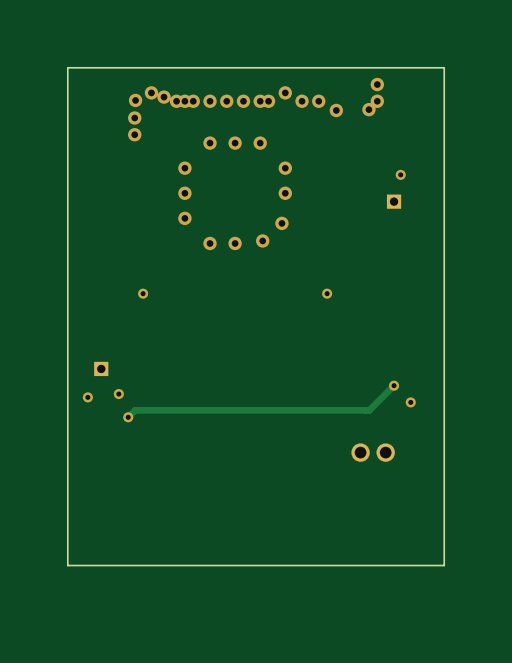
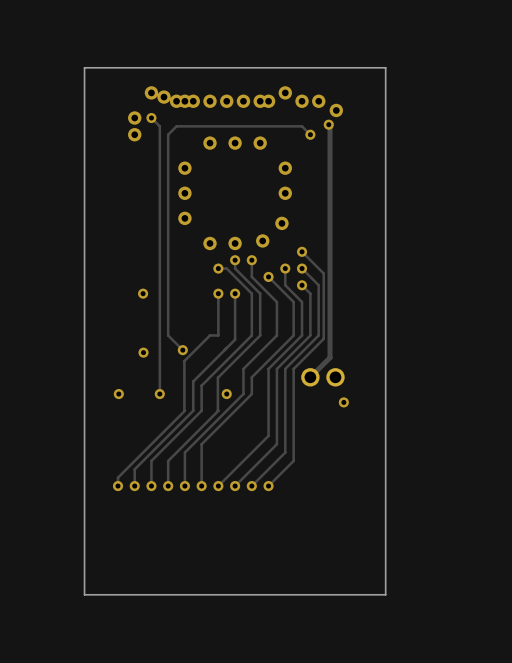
board edge: (385, 67) (444, 67) (444, 565) (67, 565) (67, 67) (84, 67) -> (385, 67) (385, 594) (84, 594) (84, 67)
via: (377, 84) -> none
via: (135, 100) -> none
via: (377, 101) -> none
via: (368, 109) -> none
track: none -> (151, 117) (159, 126) (159, 394)
via: none -> (151, 117)
track: none -> (328, 124) (330, 357) (310, 377)
via: none -> (328, 124)
track: none -> (310, 134) (302, 126) (176, 126) (168, 134) (168, 335) (182, 350)
via: none -> (310, 134)
via: (400, 174) -> none
part: (394, 201) -> none
track: none -> (302, 251) (323, 273) (323, 338) (293, 368) (293, 460) (268, 486)
via: none -> (302, 251)
track: none -> (235, 260) (235, 268) (260, 293) (260, 335) (217, 377) (218, 410) (168, 460) (168, 486)
via: none -> (235, 260)
track: none -> (251, 260) (251, 276) (276, 302) (276, 335) (243, 368) (243, 394) (184, 452) (184, 486)
via: none -> (251, 260)
track: none -> (218, 268) (226, 268) (251, 293) (251, 335) (201, 385) (201, 410) (151, 460) (151, 486)
via: none -> (218, 268)
track: none -> (285, 268) (285, 285) (302, 302) (302, 335) (268, 368) (268, 435) (218, 486)
via: none -> (285, 268)
track: none -> (302, 268) (318, 285) (318, 335) (285, 368) (285, 452) (251, 486)
via: none -> (302, 268)
track: none -> (268, 276) (293, 302) (293, 335) (251, 377) (251, 394) (201, 444) (201, 486)
via: none -> (268, 276)
track: none -> (302, 285) (310, 293) (310, 335) (276, 368) (276, 444) (235, 486)
via: none -> (302, 285)
track: none -> (218, 293) (218, 335) (210, 335) (184, 361) (184, 410) (117, 477) (117, 486)
via: none -> (218, 293)
track: none -> (235, 293) (235, 339) (193, 381) (193, 410) (134, 469) (134, 486)
via: none -> (235, 293)
via: (327, 293) -> none
via: none -> (182, 350)
via: none -> (143, 352)
part: (101, 368) -> none
track: (394, 385) (369, 410) (135, 410) (128, 417) -> none
via: (394, 385) -> none
via: none -> (159, 394)
via: none -> (226, 394)
via: (87, 397) -> none
via: none -> (343, 402)
via: (410, 402) -> none
via: (128, 417) -> none
part position: (373, 452) -> (322, 377)
via: none -> (117, 486)
via: none -> (134, 486)
via: none -> (151, 486)
via: none -> (168, 486)
via: none -> (184, 486)
via: none -> (201, 486)
via: none -> (218, 486)
via: none -> (235, 486)
via: none -> (251, 486)
via: none -> (268, 486)

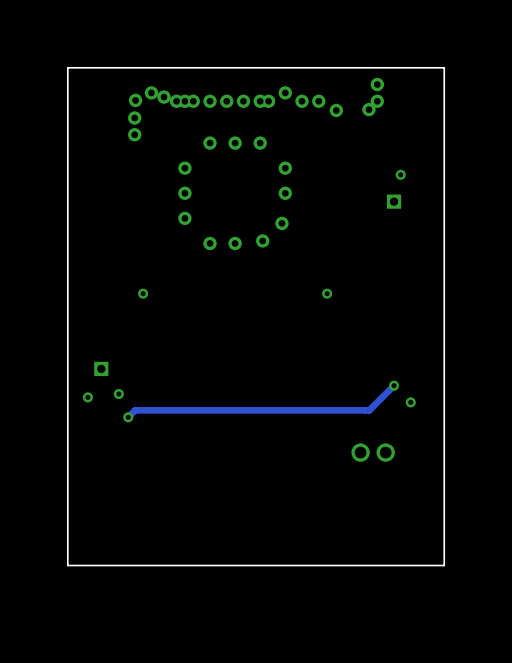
board edge: (385, 67) (385, 594) (84, 594) (84, 67) -> (385, 67) (444, 67) (444, 565) (67, 565) (67, 67) (84, 67)
via: none -> (377, 84)
via: none -> (135, 100)
via: none -> (377, 101)
via: none -> (368, 109)
track: (151, 117) (159, 126) (159, 394) -> none
via: (151, 117) -> none
track: (328, 124) (330, 357) (310, 377) -> none
via: (328, 124) -> none
track: (310, 134) (302, 126) (176, 126) (168, 134) (168, 335) (182, 350) -> none
via: (310, 134) -> none
via: none -> (400, 174)
part: none -> (394, 201)
track: (302, 251) (323, 273) (323, 338) (293, 368) (293, 460) (268, 486) -> none
via: (302, 251) -> none
track: (235, 260) (235, 268) (260, 293) (260, 335) (217, 377) (218, 410) (168, 460) (168, 486) -> none
via: (235, 260) -> none
track: (251, 260) (251, 276) (276, 302) (276, 335) (243, 368) (243, 394) (184, 452) (184, 486) -> none
via: (251, 260) -> none
track: (218, 268) (226, 268) (251, 293) (251, 335) (201, 385) (201, 410) (151, 460) (151, 486) -> none
via: (218, 268) -> none
track: (285, 268) (285, 285) (302, 302) (302, 335) (268, 368) (268, 435) (218, 486) -> none
via: (285, 268) -> none
track: (302, 268) (318, 285) (318, 335) (285, 368) (285, 452) (251, 486) -> none
via: (302, 268) -> none
track: (268, 276) (293, 302) (293, 335) (251, 377) (251, 394) (201, 444) (201, 486) -> none
via: (268, 276) -> none
track: (302, 285) (310, 293) (310, 335) (276, 368) (276, 444) (235, 486) -> none
via: (302, 285) -> none
track: (218, 293) (218, 335) (210, 335) (184, 361) (184, 410) (117, 477) (117, 486) -> none
via: (218, 293) -> none
track: (235, 293) (235, 339) (193, 381) (193, 410) (134, 469) (134, 486) -> none
via: (235, 293) -> none
via: none -> (327, 293)
via: (182, 350) -> none
via: (143, 352) -> none
part: none -> (101, 368)
part position: (322, 377) -> (373, 452)
track: none -> (394, 385) (369, 410) (135, 410) (128, 417)
via: none -> (394, 385)
via: (159, 394) -> none
via: (226, 394) -> none
via: none -> (87, 397)
via: (343, 402) -> none
via: none -> (410, 402)
via: none -> (128, 417)
via: (117, 486) -> none
via: (134, 486) -> none
via: (151, 486) -> none
via: (168, 486) -> none
via: (184, 486) -> none
via: (201, 486) -> none
via: (218, 486) -> none
via: (235, 486) -> none
via: (251, 486) -> none
via: (268, 486) -> none

